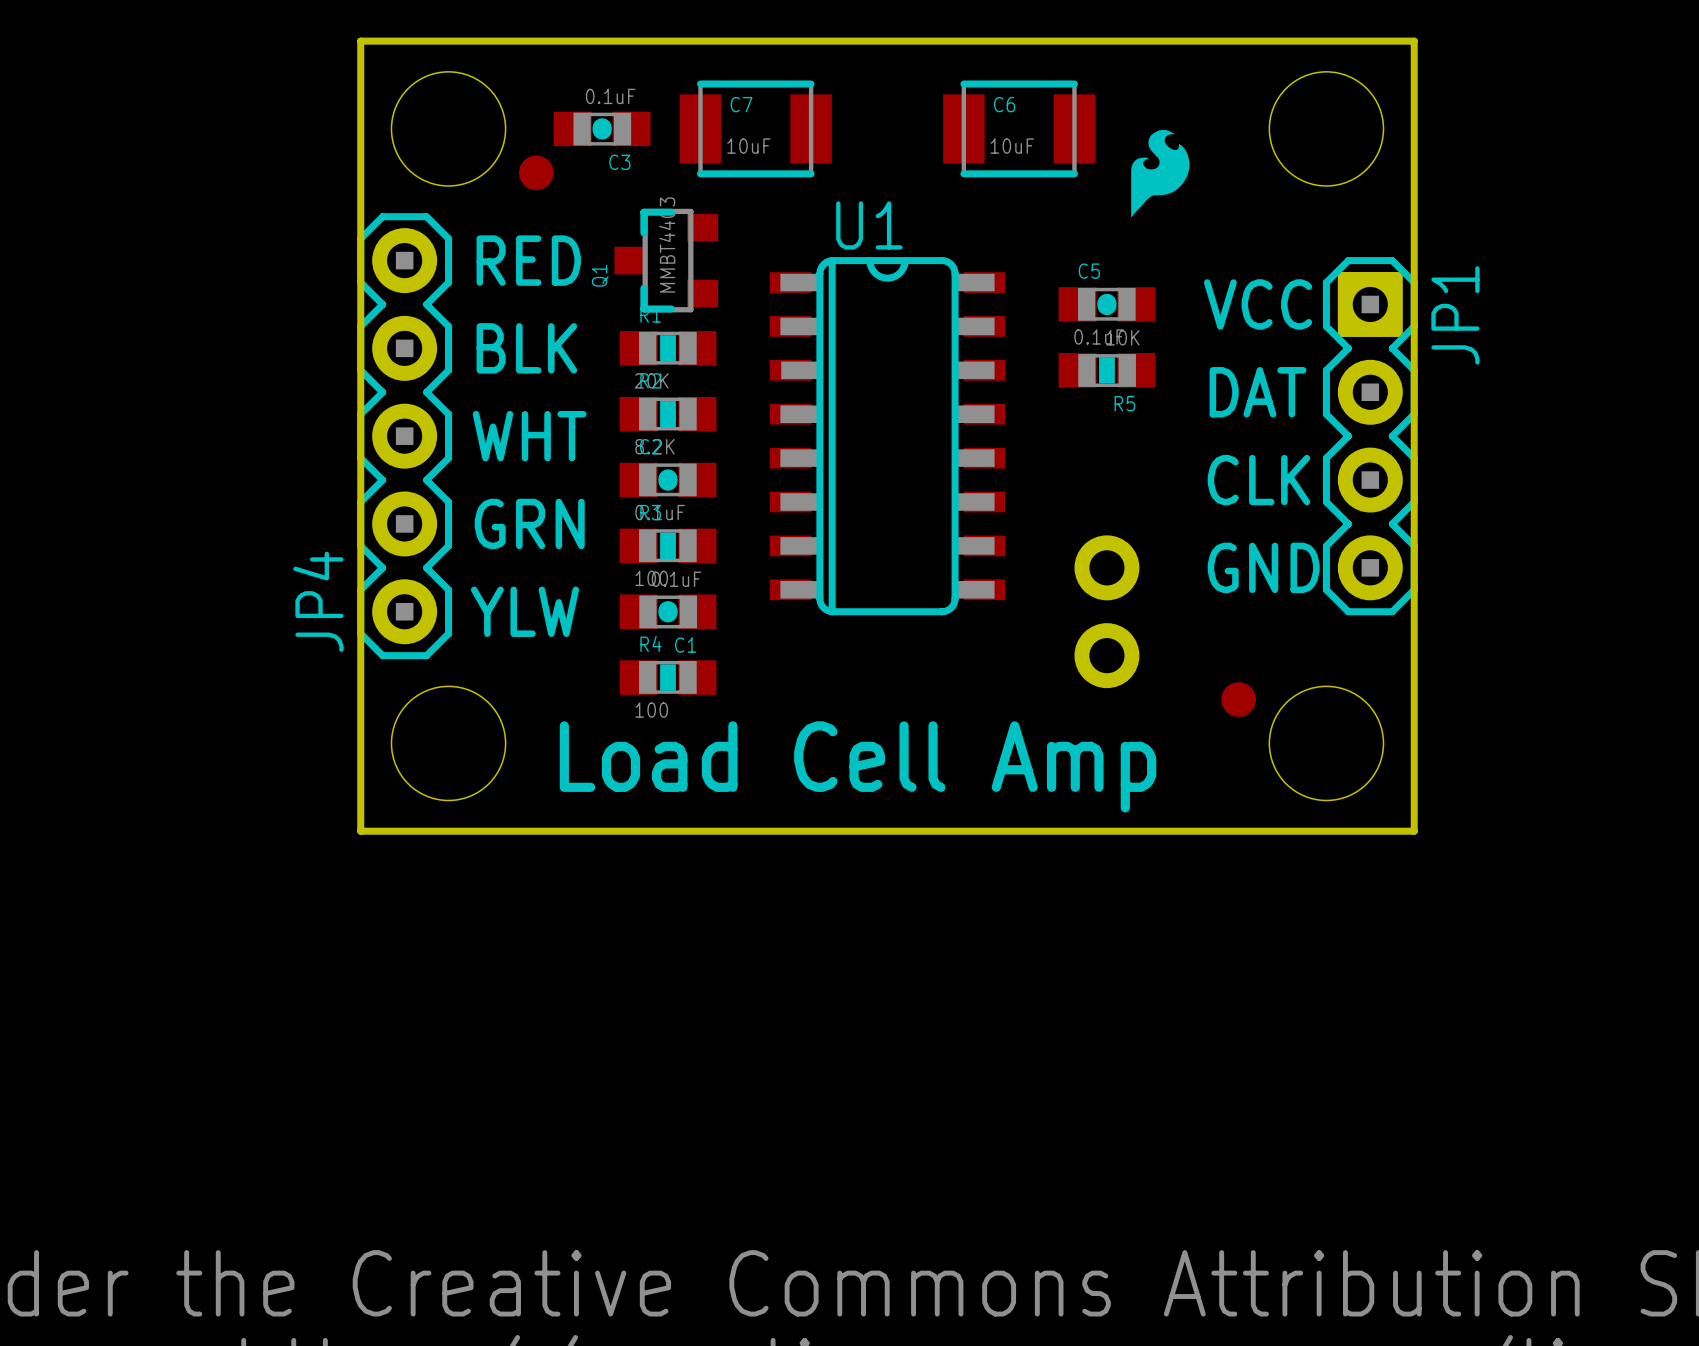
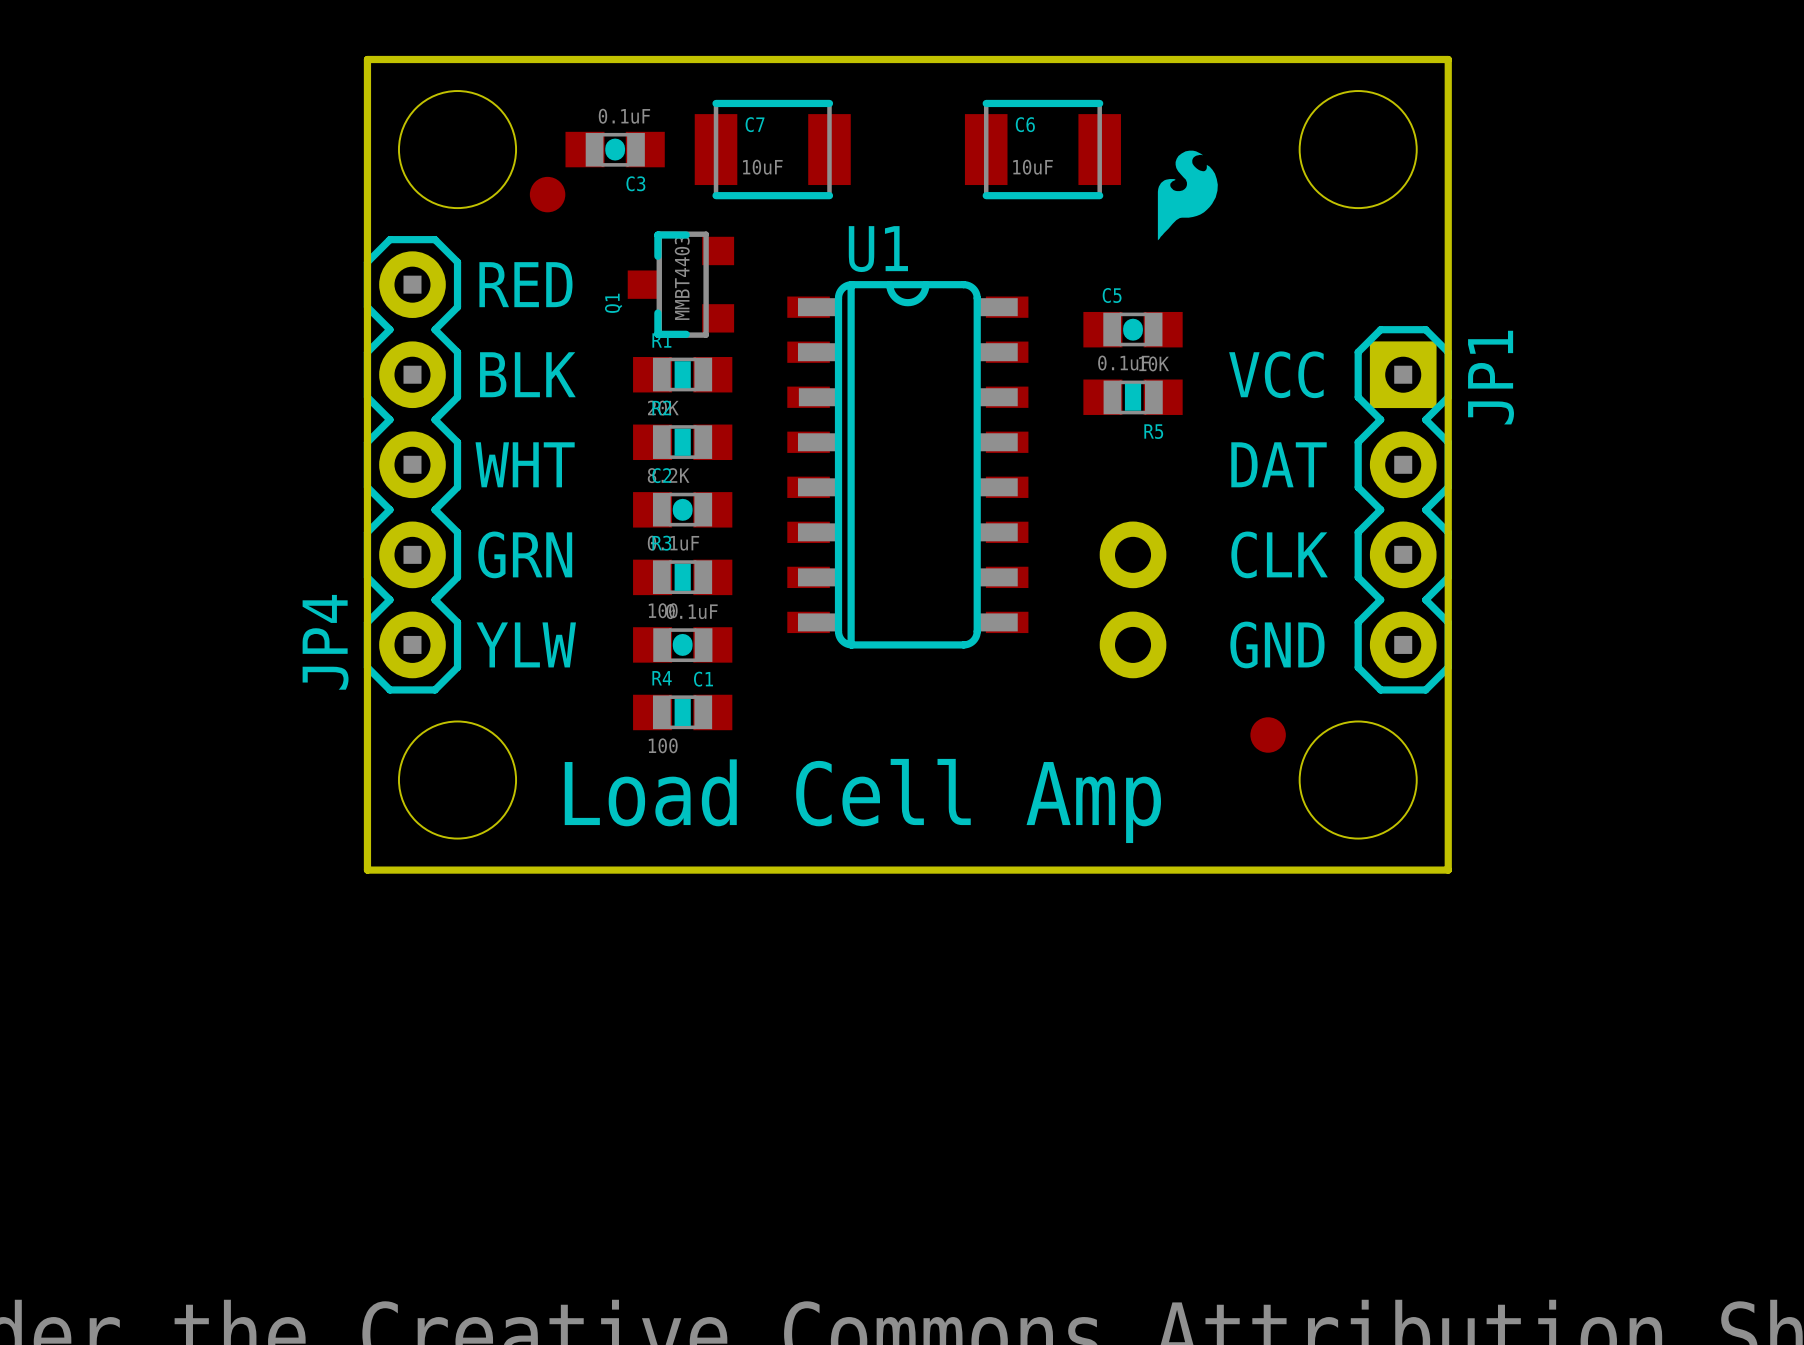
text position: VCC (1258, 304) -> VCC (1276, 374)
text position: DAT (1258, 392) -> DAT (1279, 464)
JP1 position: (1370, 436) -> (1403, 509)
text position: CLK (1258, 480) -> CLK (1279, 554)
text position: GND (1263, 567) -> GND (1277, 644)
part position: (1106, 611) -> (1133, 599)

